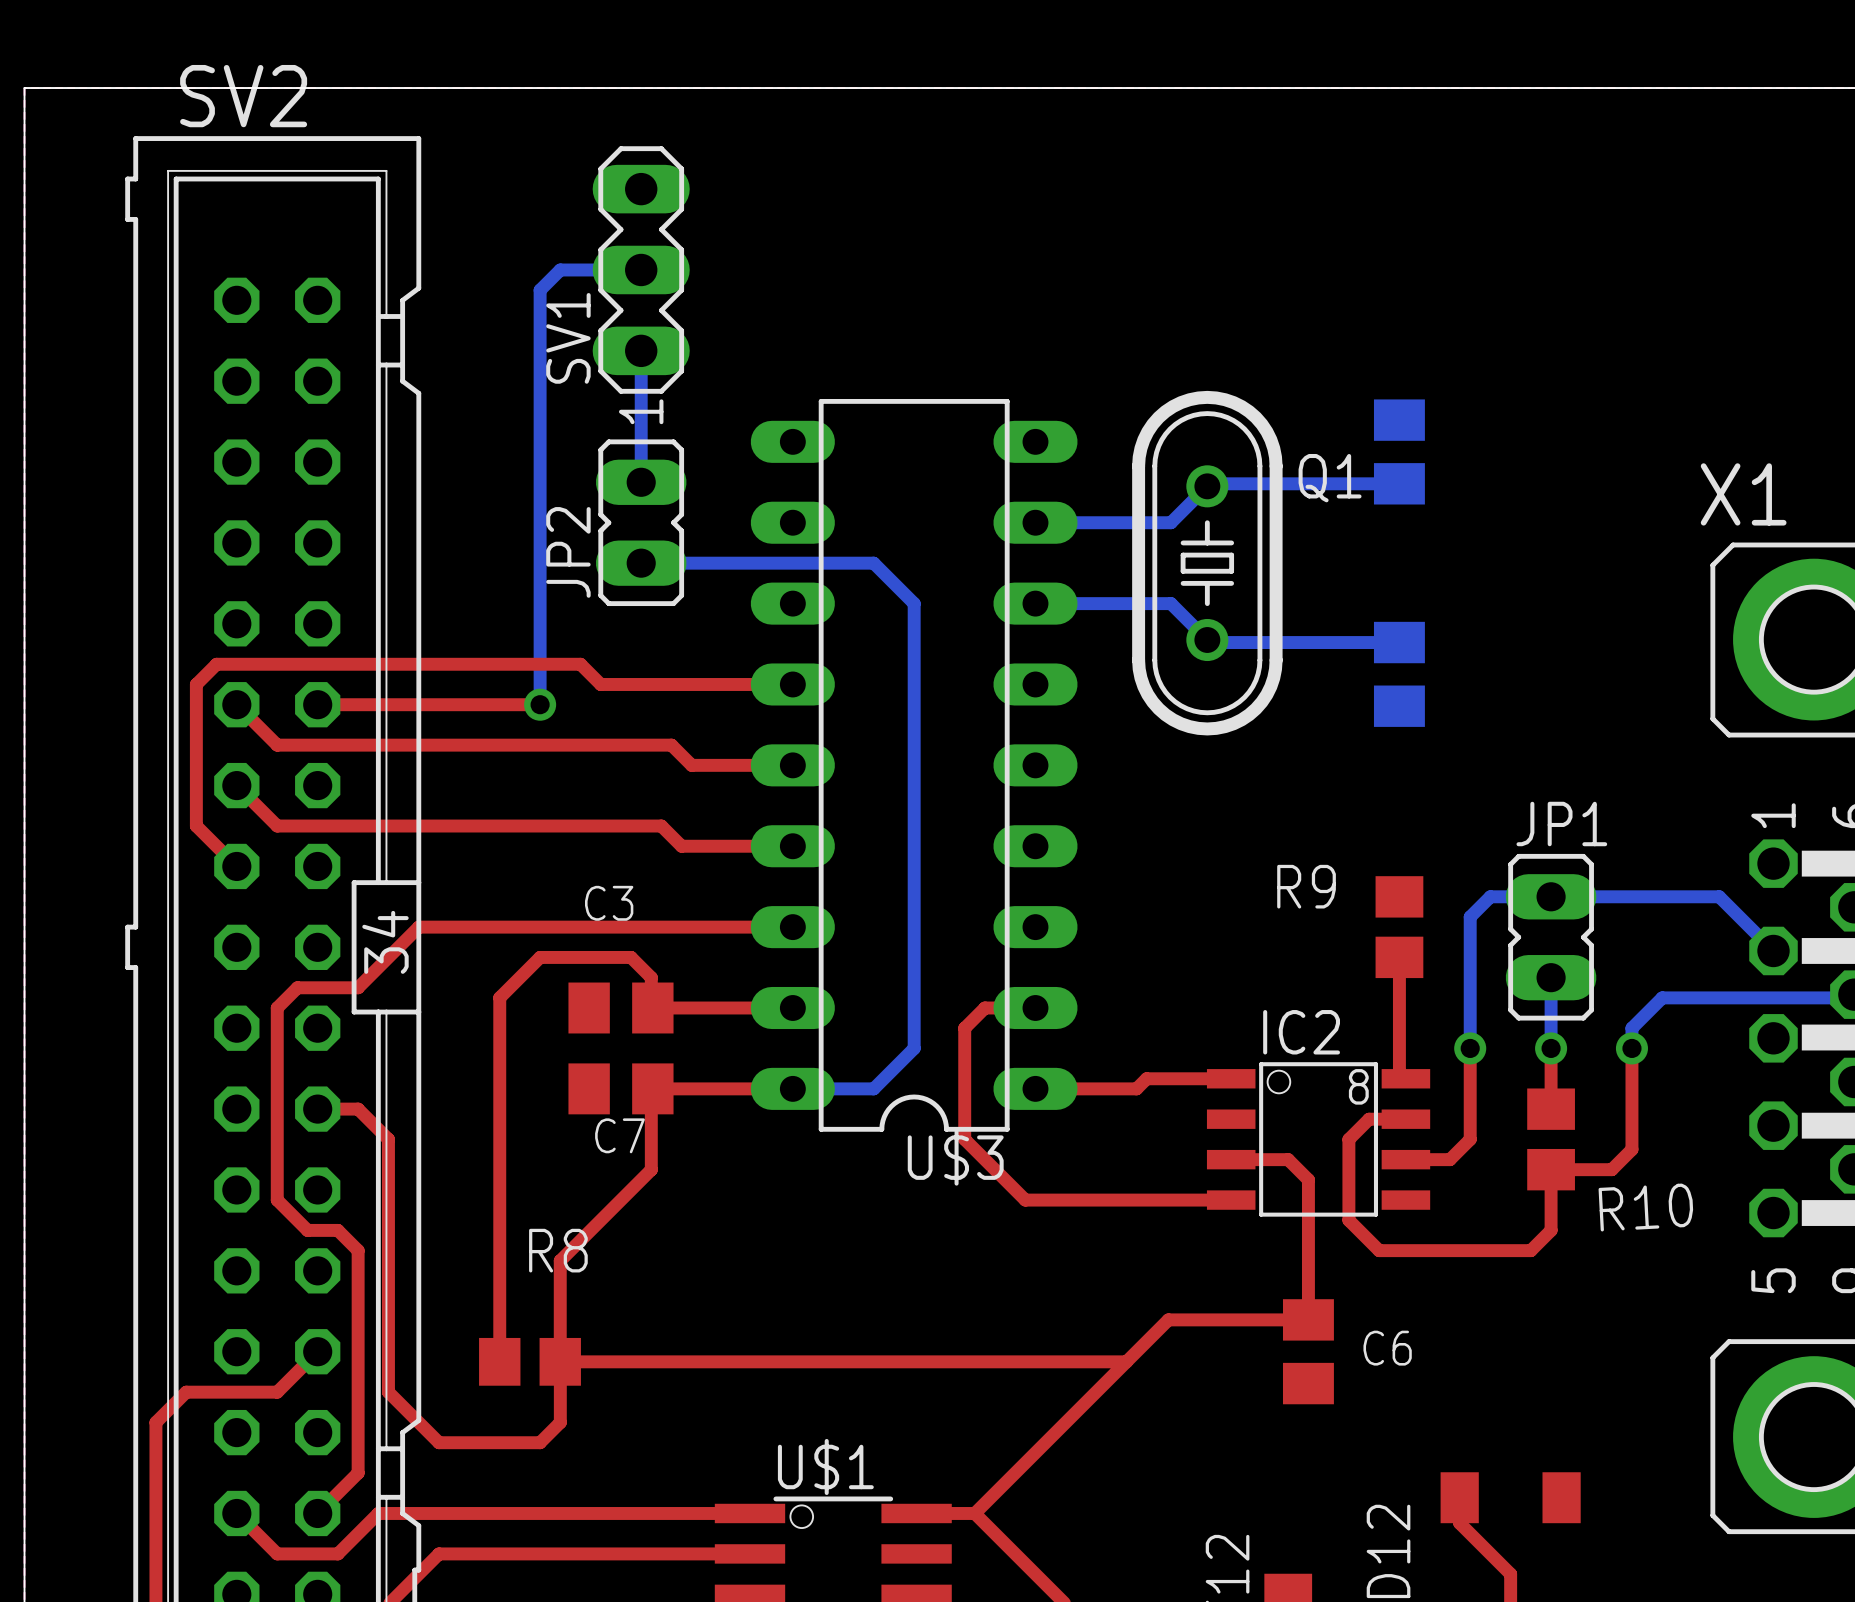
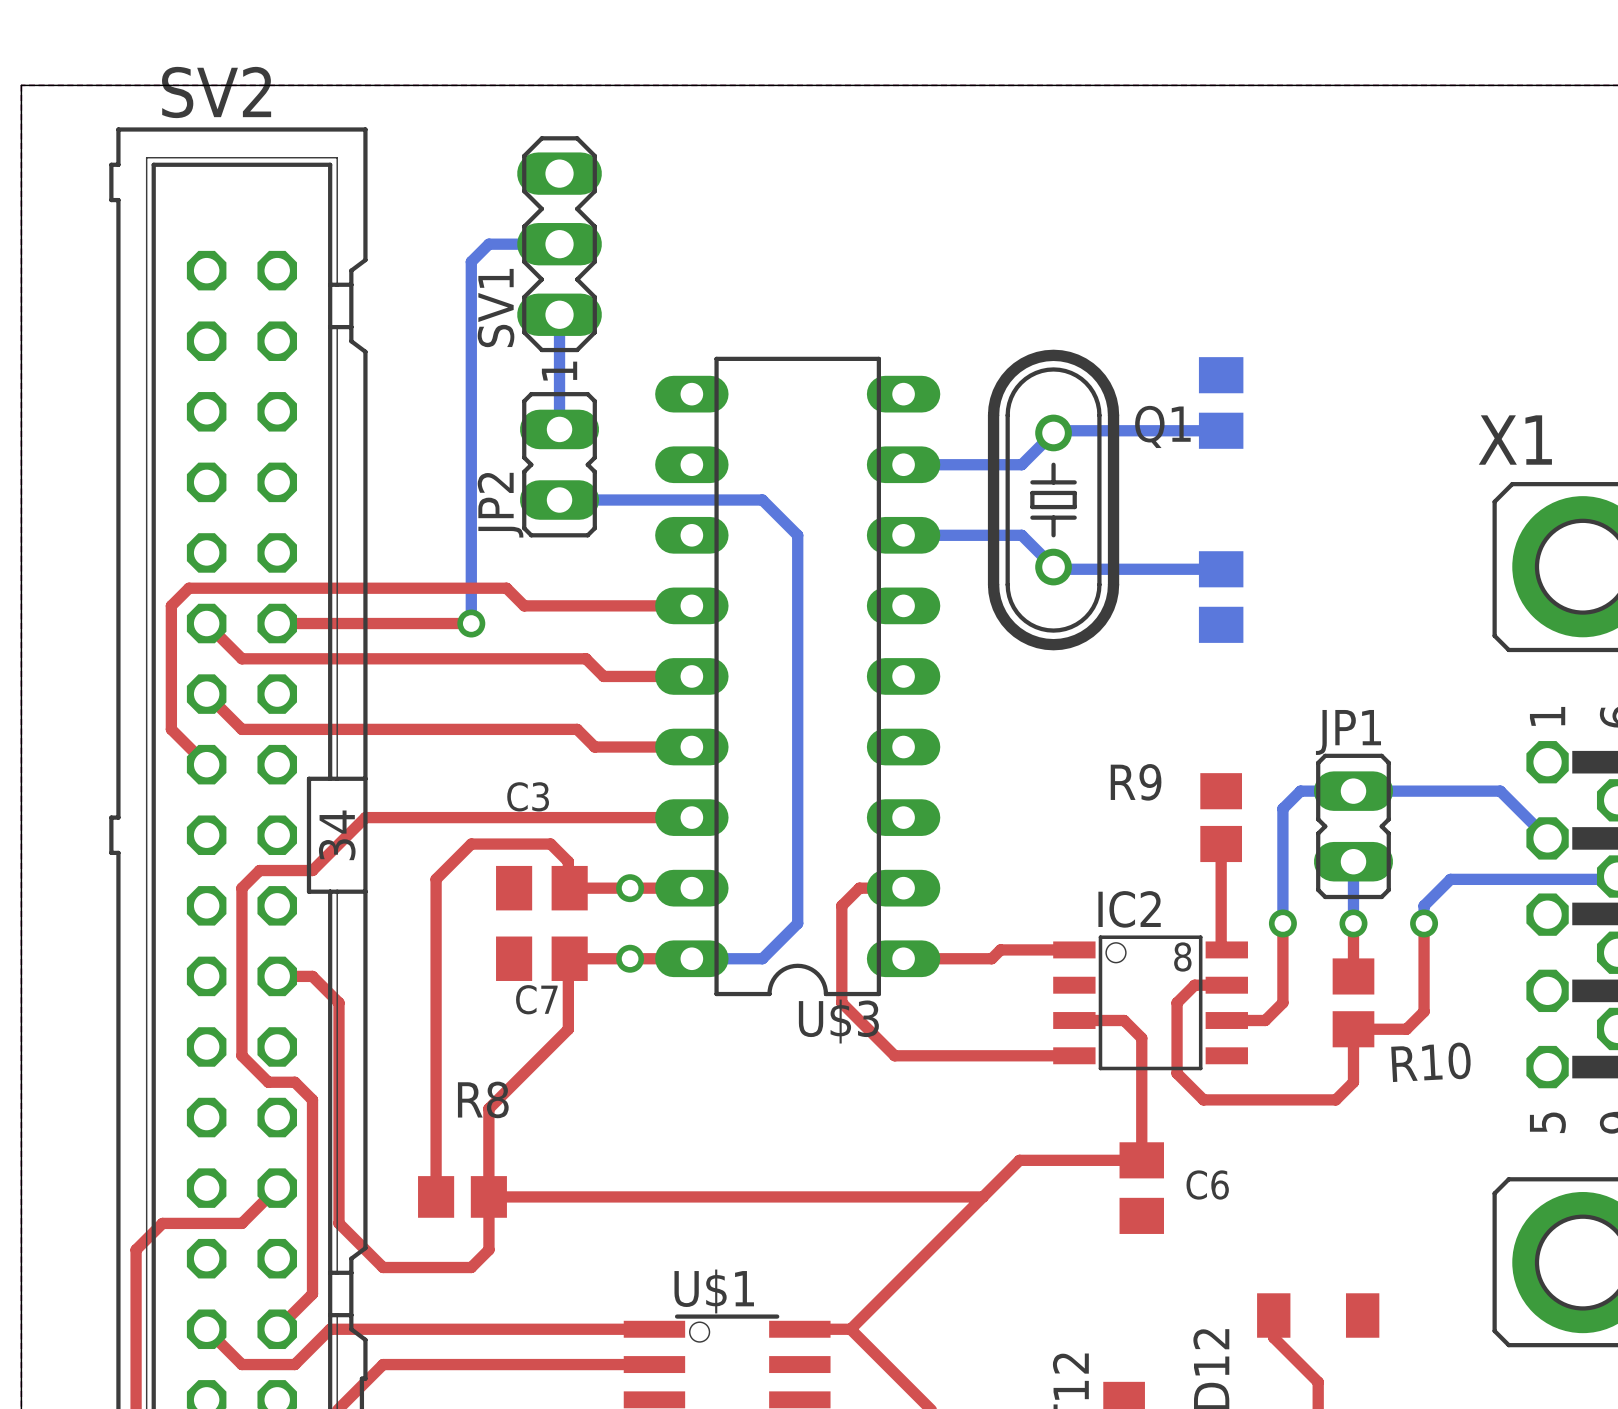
via: none -> (630, 888)
via: none -> (630, 958)

